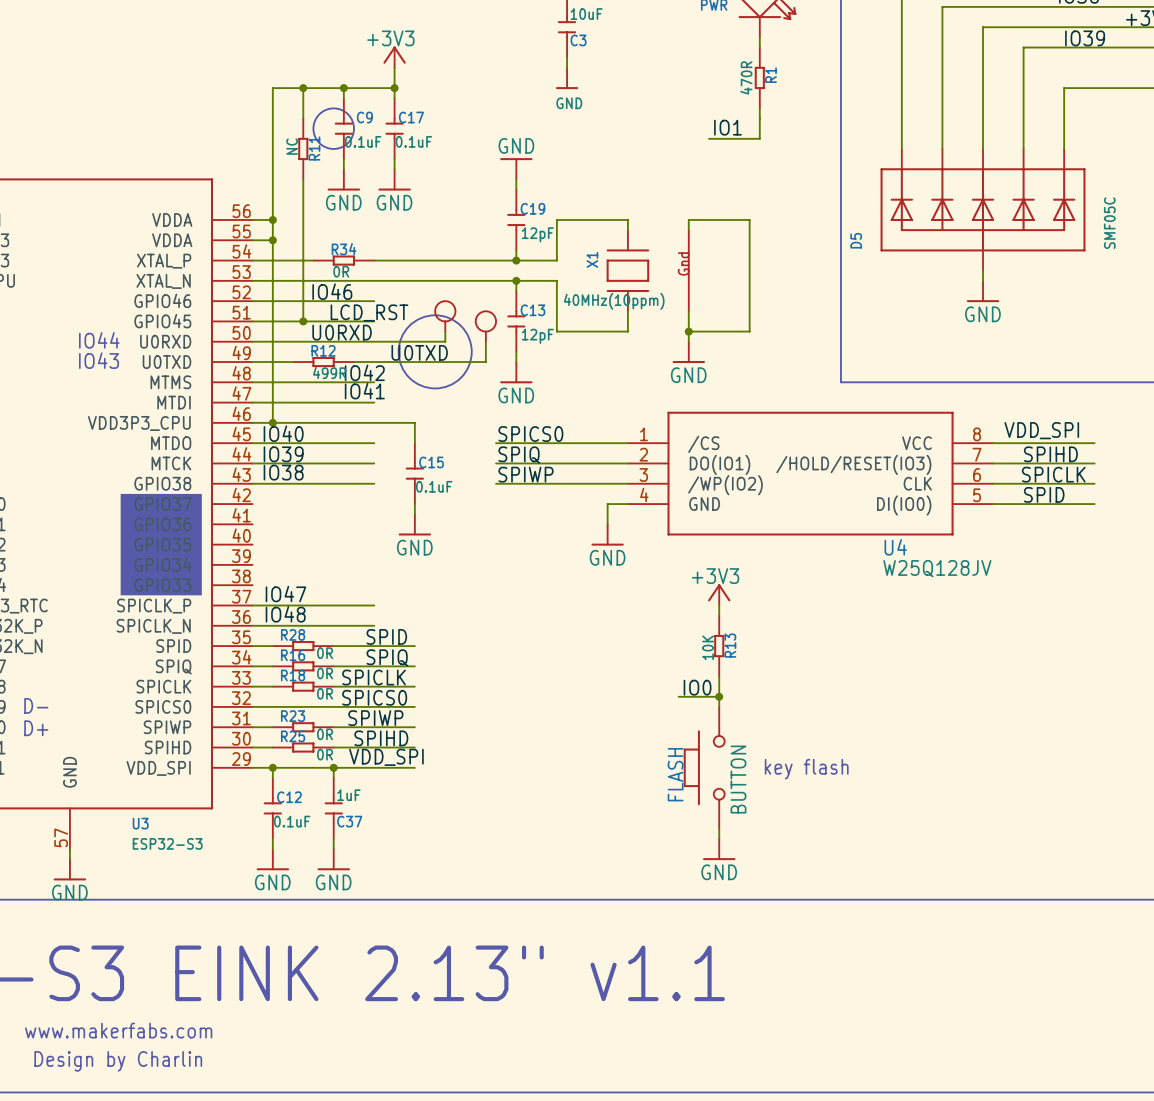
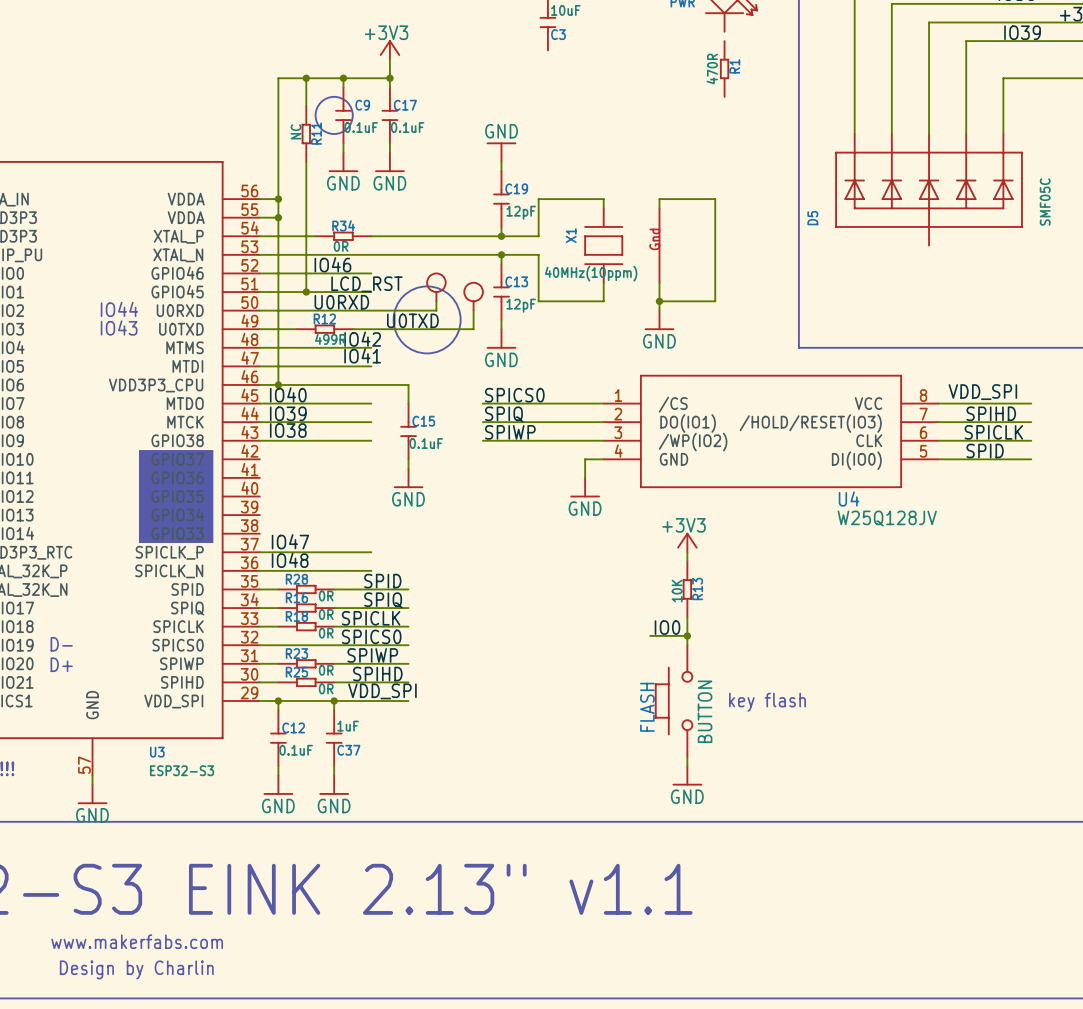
wire: (759, 37) (759, 47) -> none
wire: (567, 57) (567, 67) -> none
power symbol: GND (567, 78) -> none
wire: (759, 108) (759, 138) (709, 138) -> none
label: IO1 (727, 127) -> none
wire: (982, 270) (982, 280) -> none
power symbol: GND (982, 291) -> none

